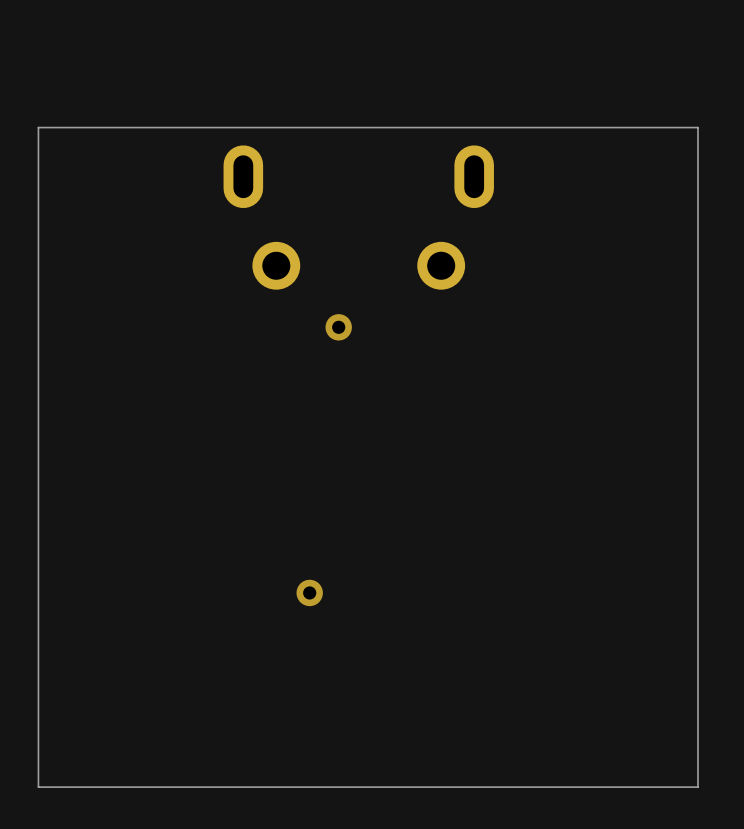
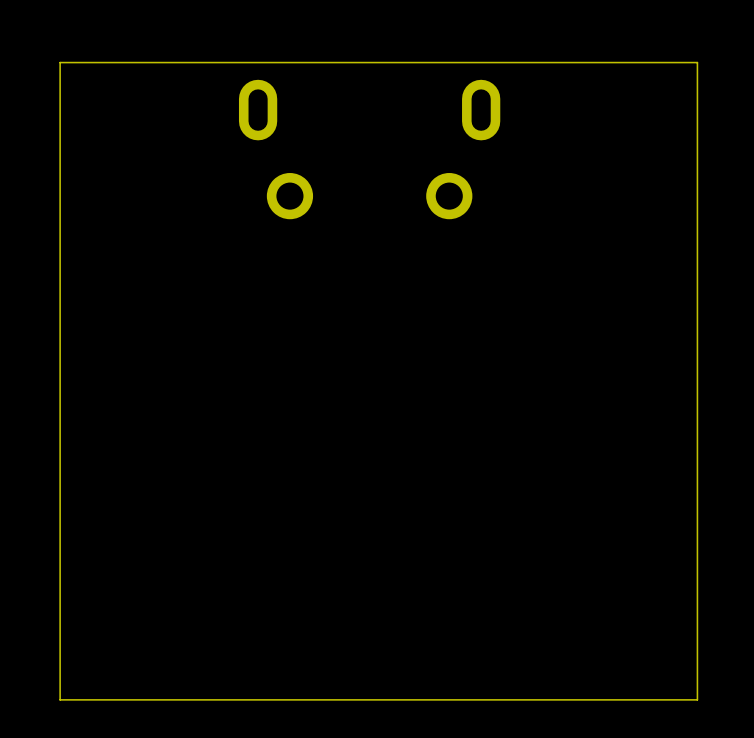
via: (338, 327) -> none
via: (309, 592) -> none

